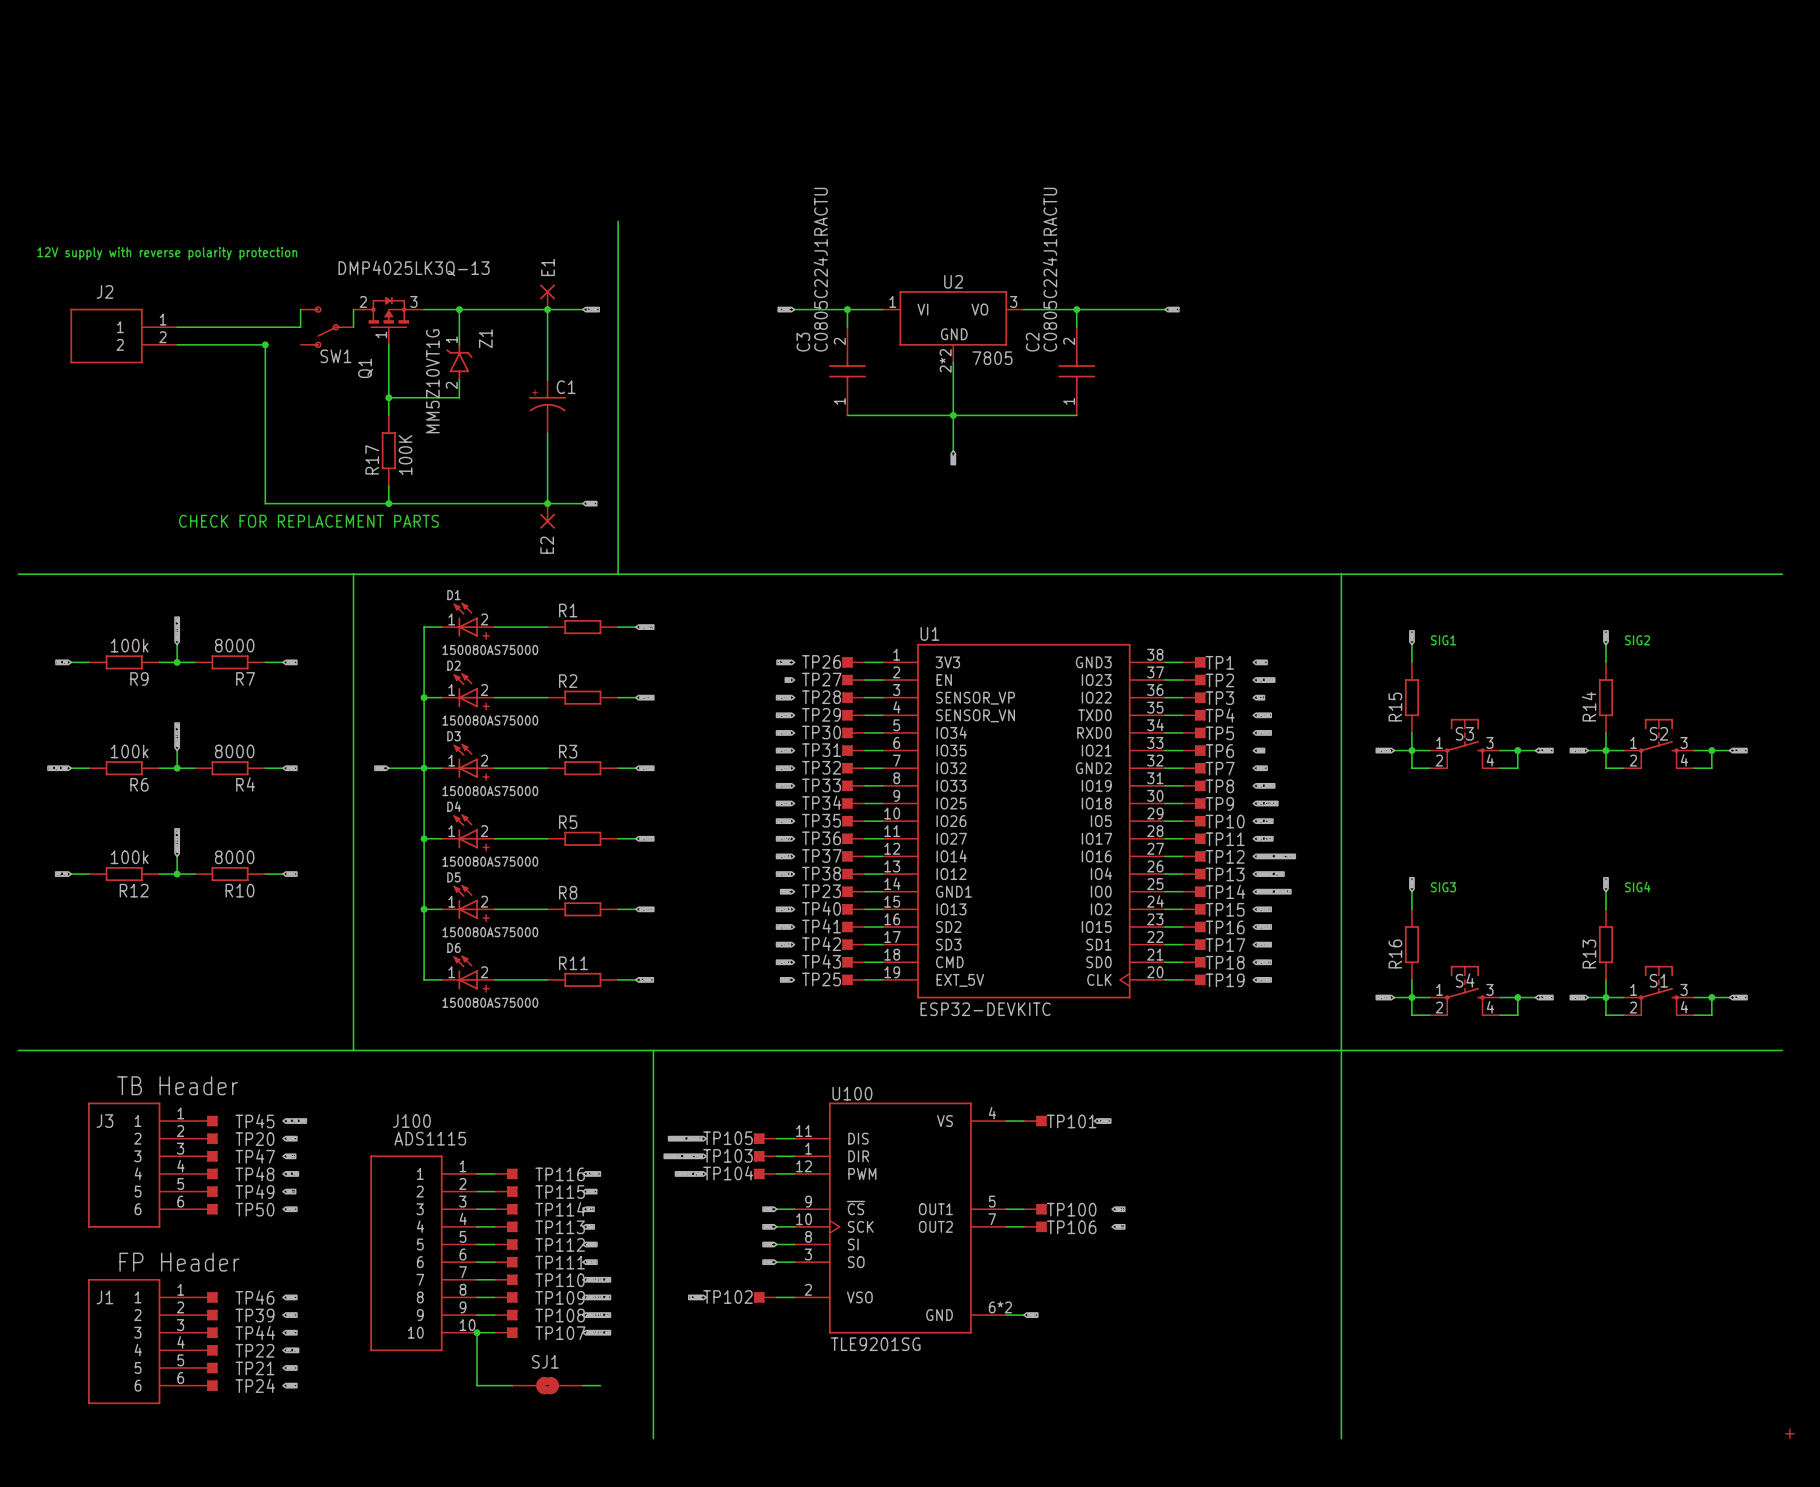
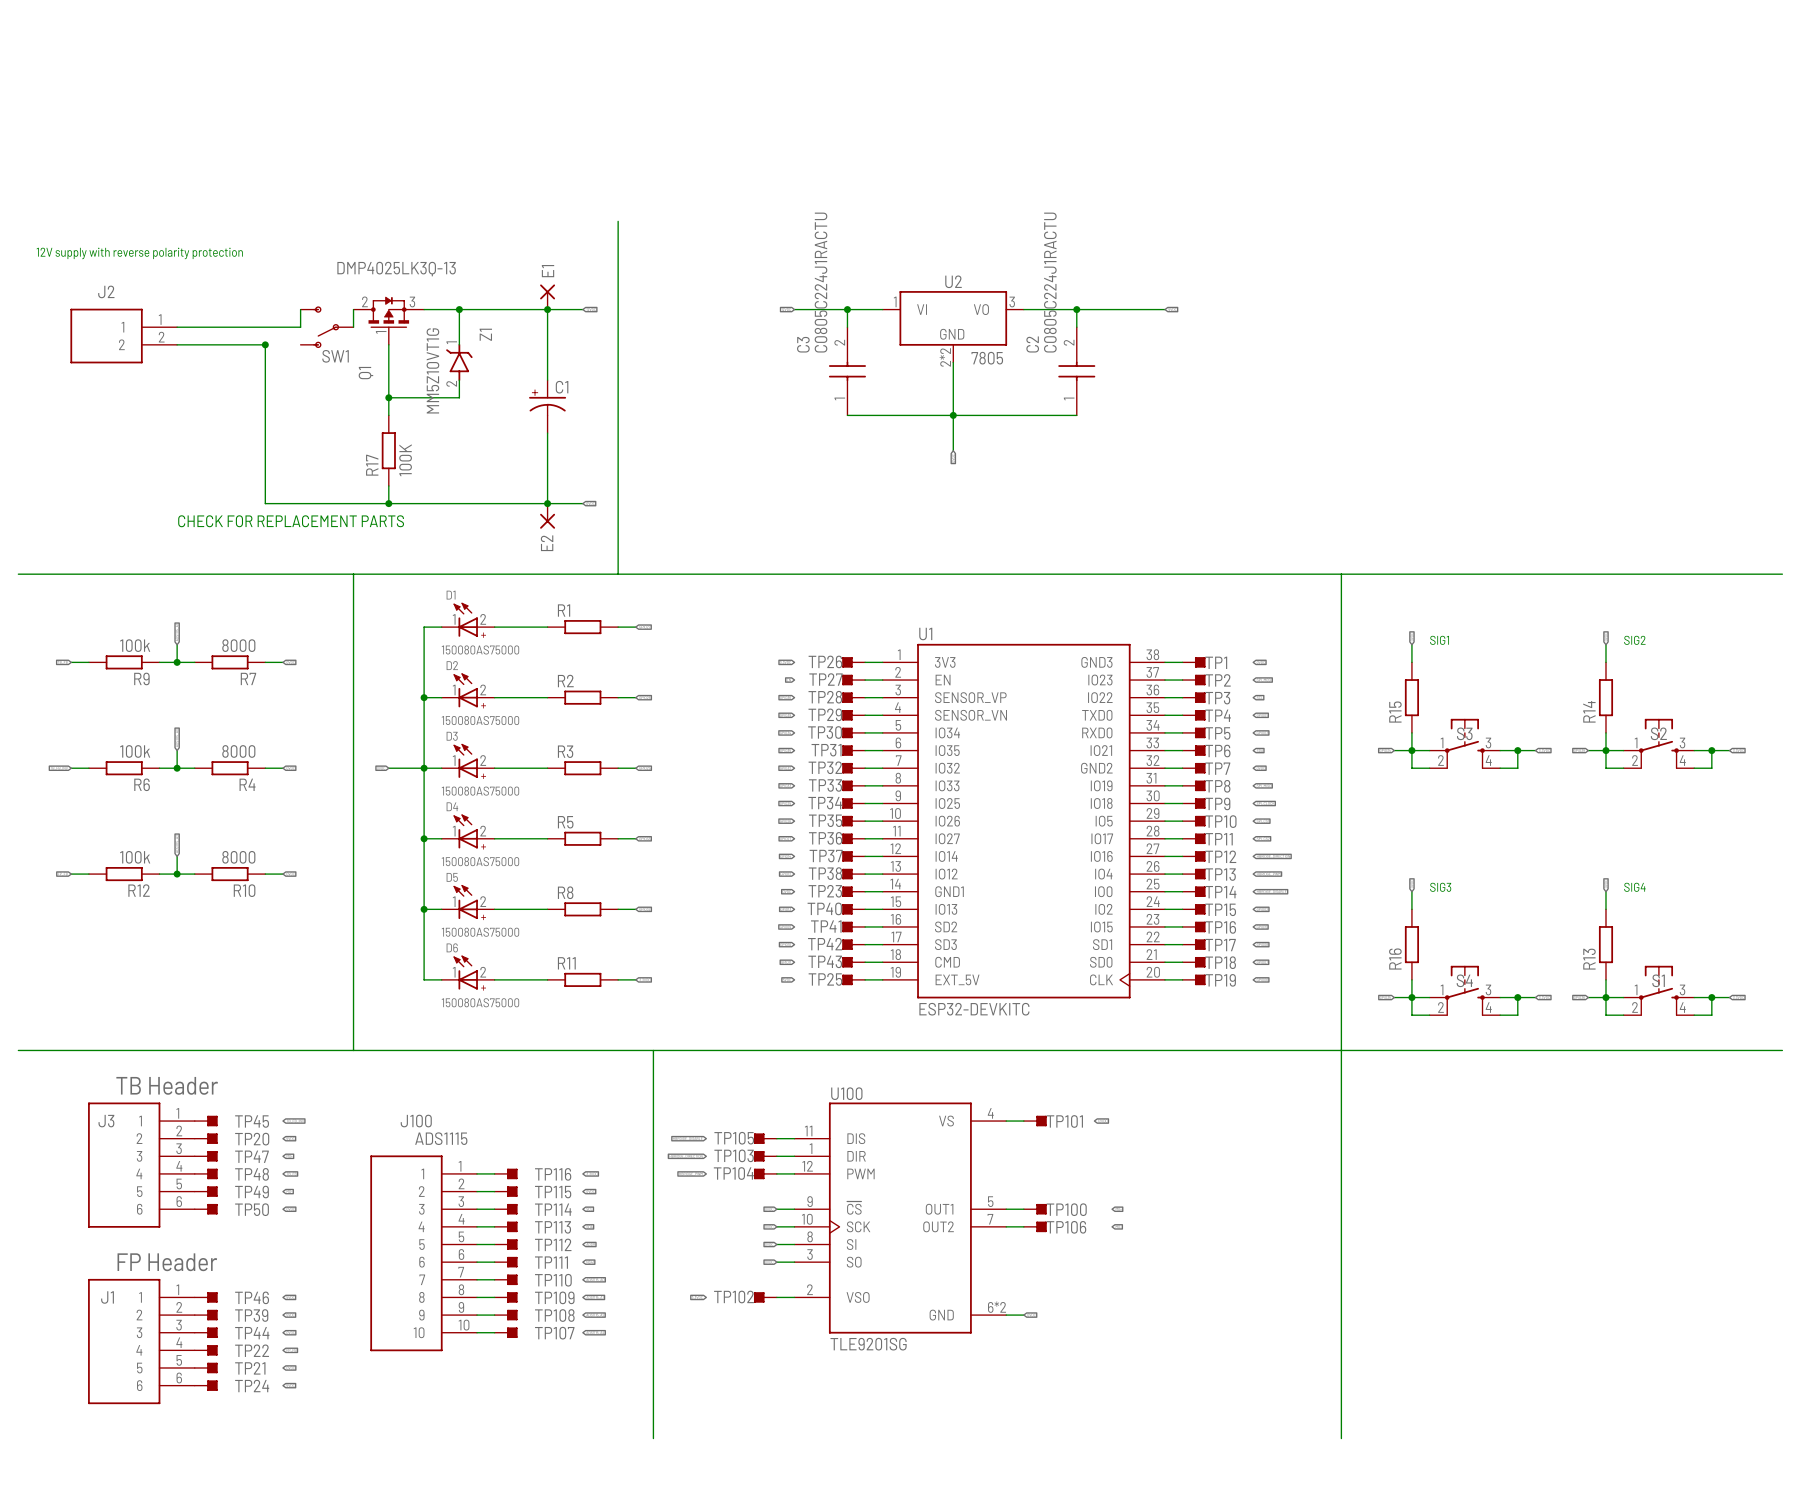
wire: (477, 1332) (477, 1385) (512, 1385) -> none
junction: (477, 1332) -> none
SJ1: (547, 1385) -> none
wire: (582, 1385) (600, 1385) -> none
part: (1789, 1433) -> none

